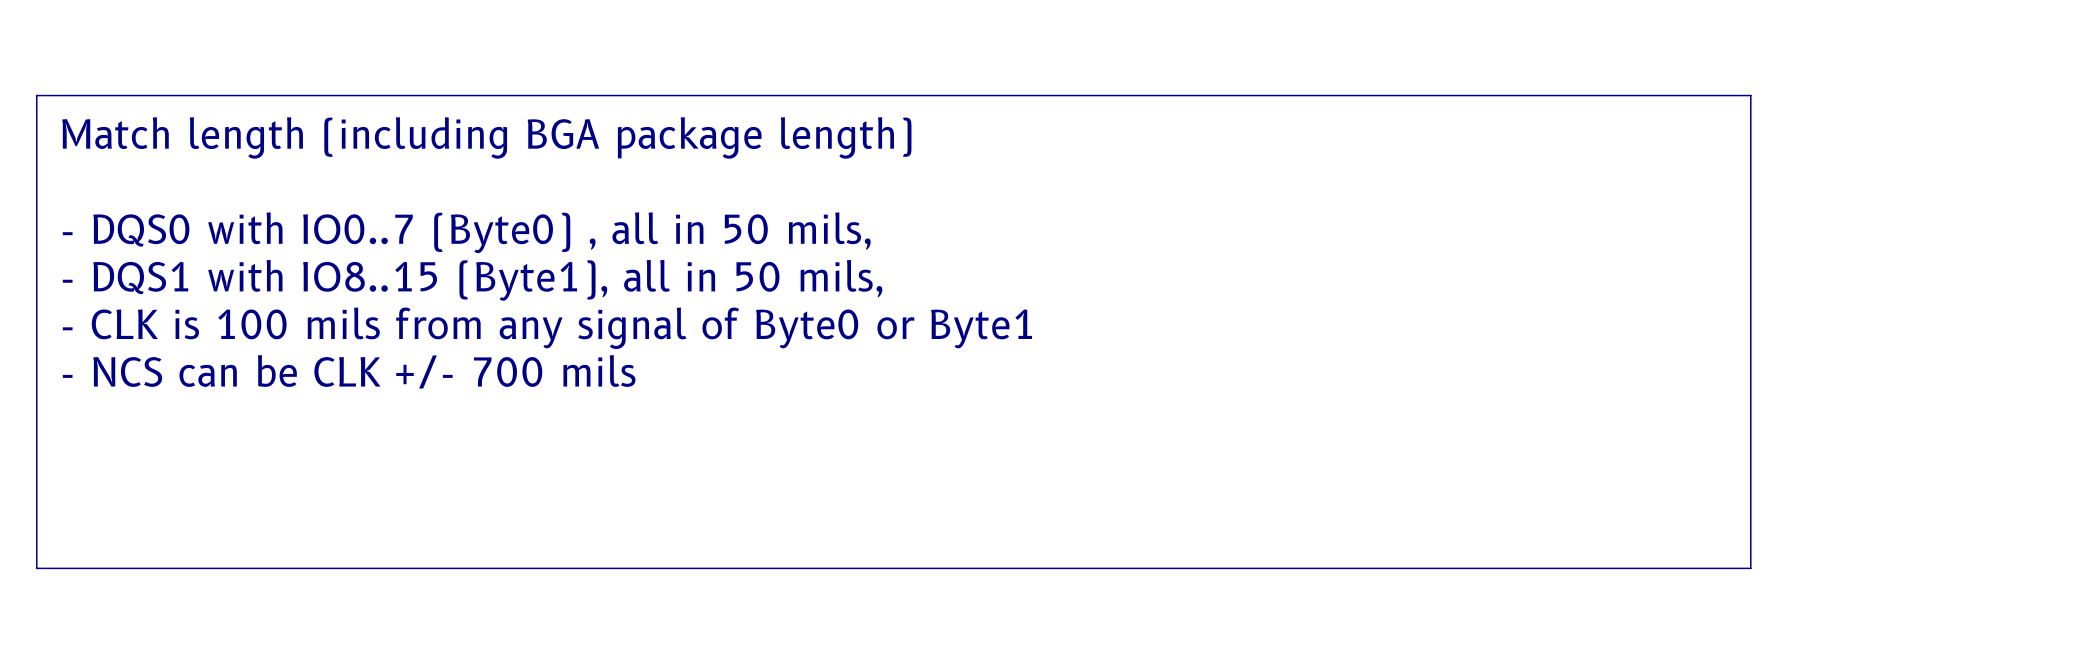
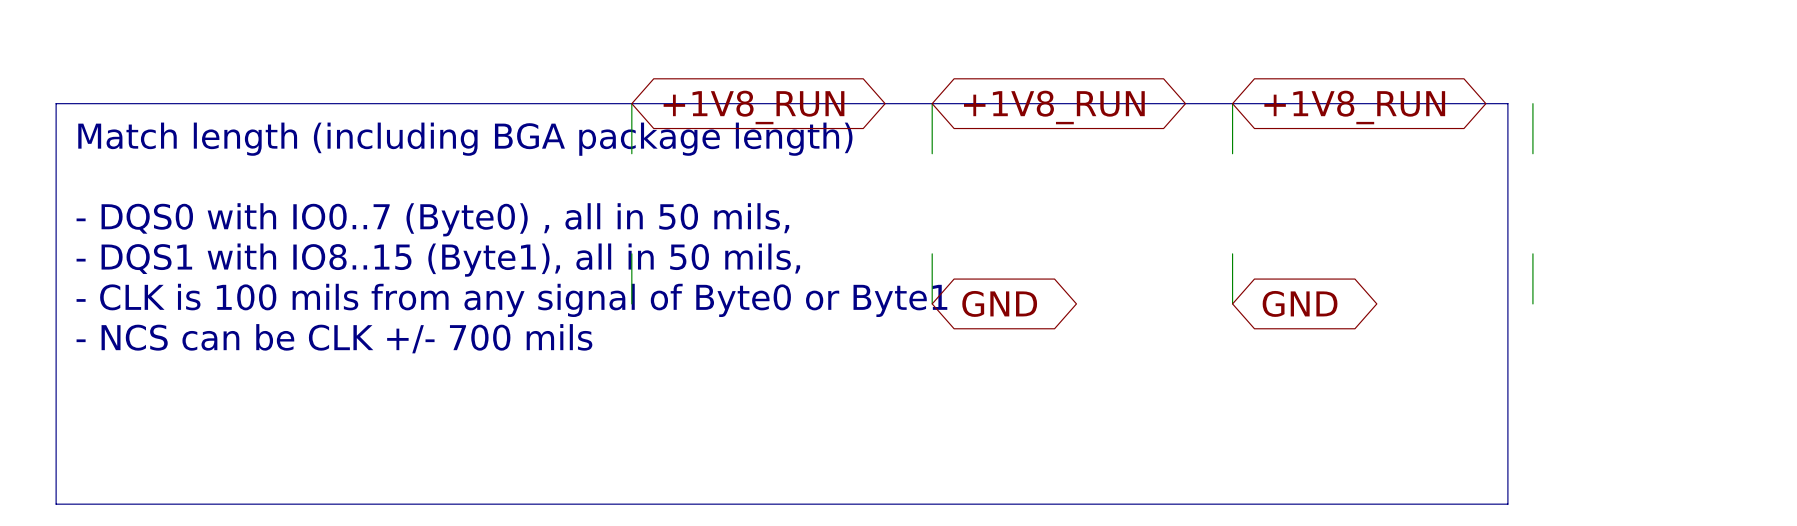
wire: none -> (631, 103) (631, 153)
wire: none -> (932, 103) (932, 153)
wire: none -> (1232, 103) (1232, 153)
wire: none -> (1532, 103) (1532, 153)
global label: none -> +1V8_RUN (754, 107)
global label: none -> +1V8_RUN (1054, 107)
global label: none -> +1V8_RUN (1354, 107)
wire: none -> (631, 253) (631, 303)
wire: none -> (932, 253) (932, 303)
wire: none -> (1232, 253) (1232, 303)
wire: none -> (1532, 253) (1532, 303)
global label: none -> GND (999, 303)
global label: none -> GND (1300, 303)

